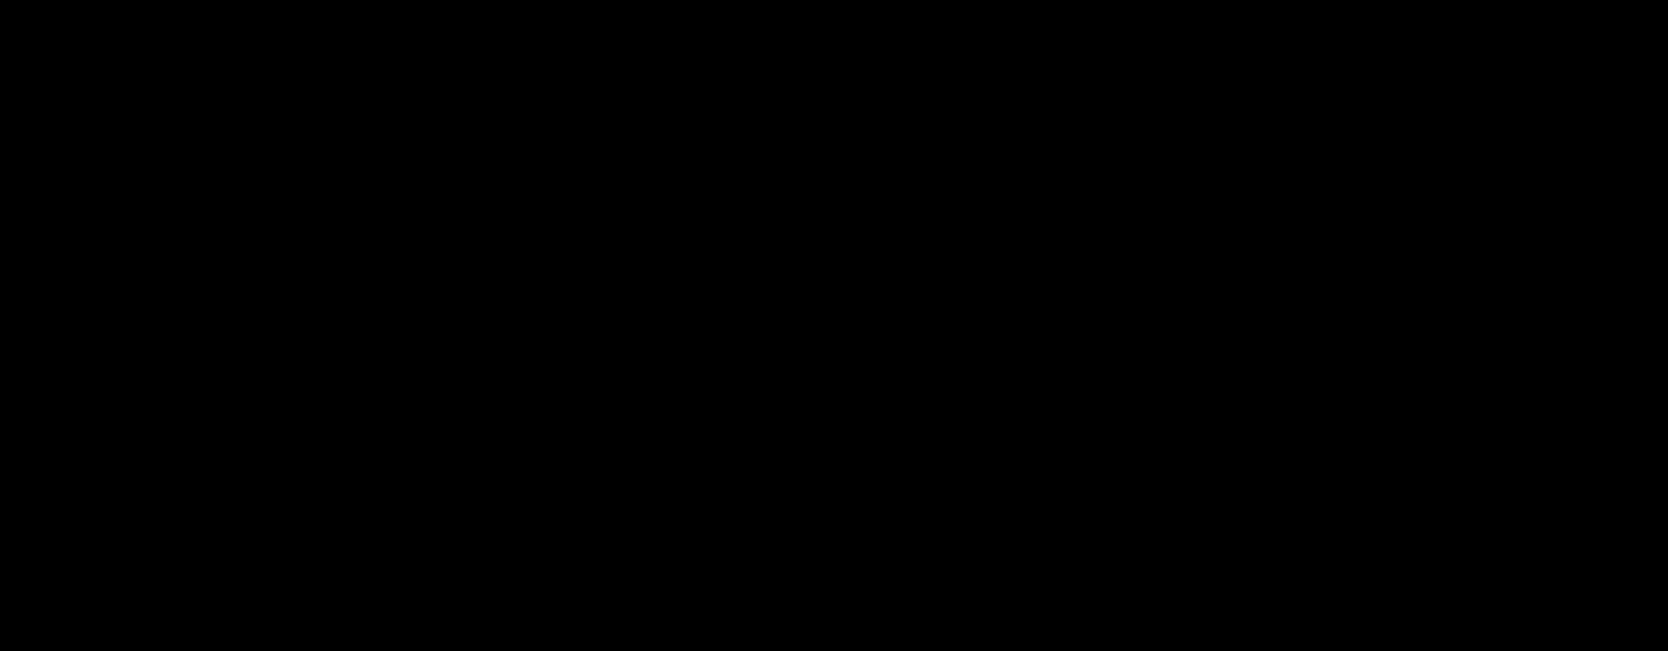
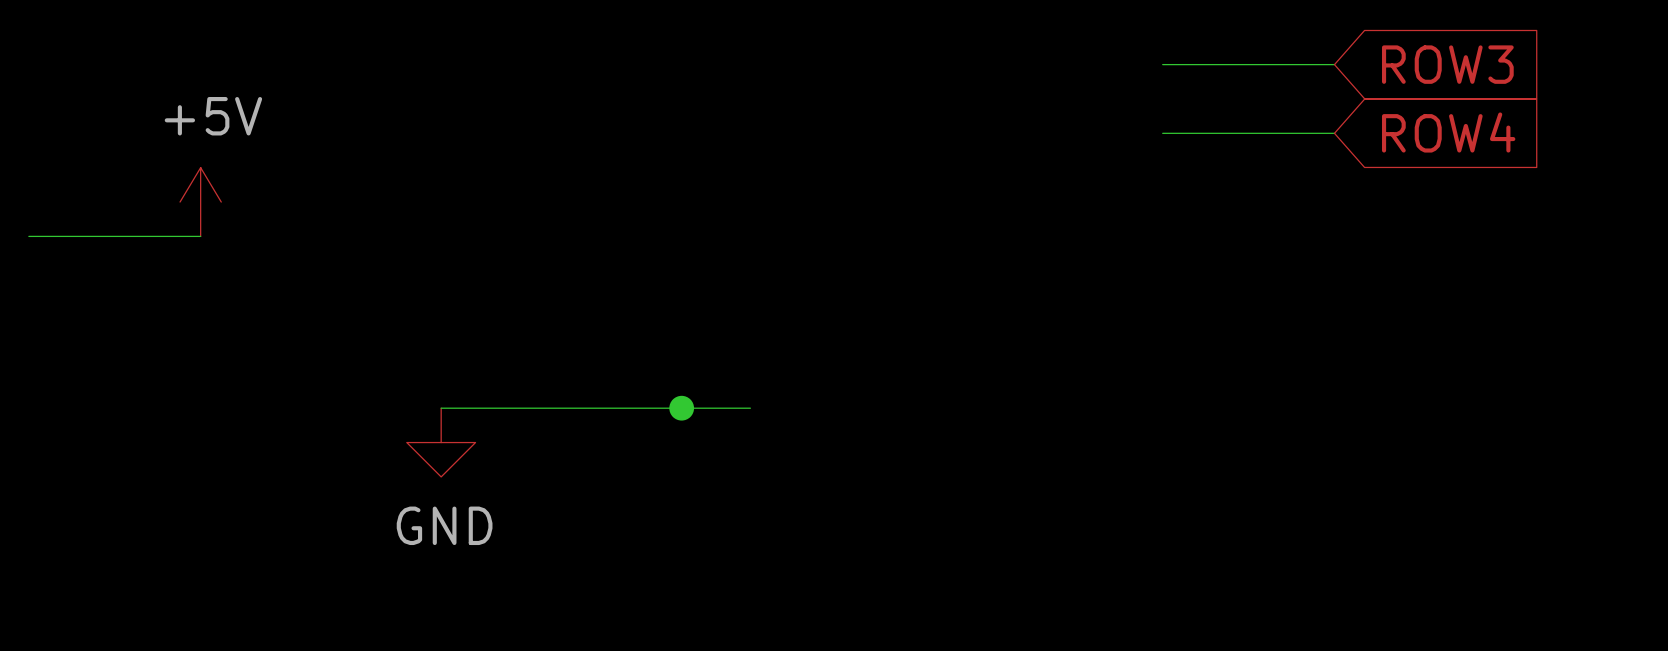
wire: none -> (1162, 64) (1334, 64)
global label: none -> ROW3 (1447, 64)
global label: none -> ROW4 (1448, 132)
wire: none -> (1162, 133) (1334, 133)
power symbol: none -> +5V (200, 202)
wire: none -> (28, 236) (200, 236)
wire: none -> (441, 408) (750, 408)
junction: none -> (681, 408)
power symbol: none -> GND (441, 442)

